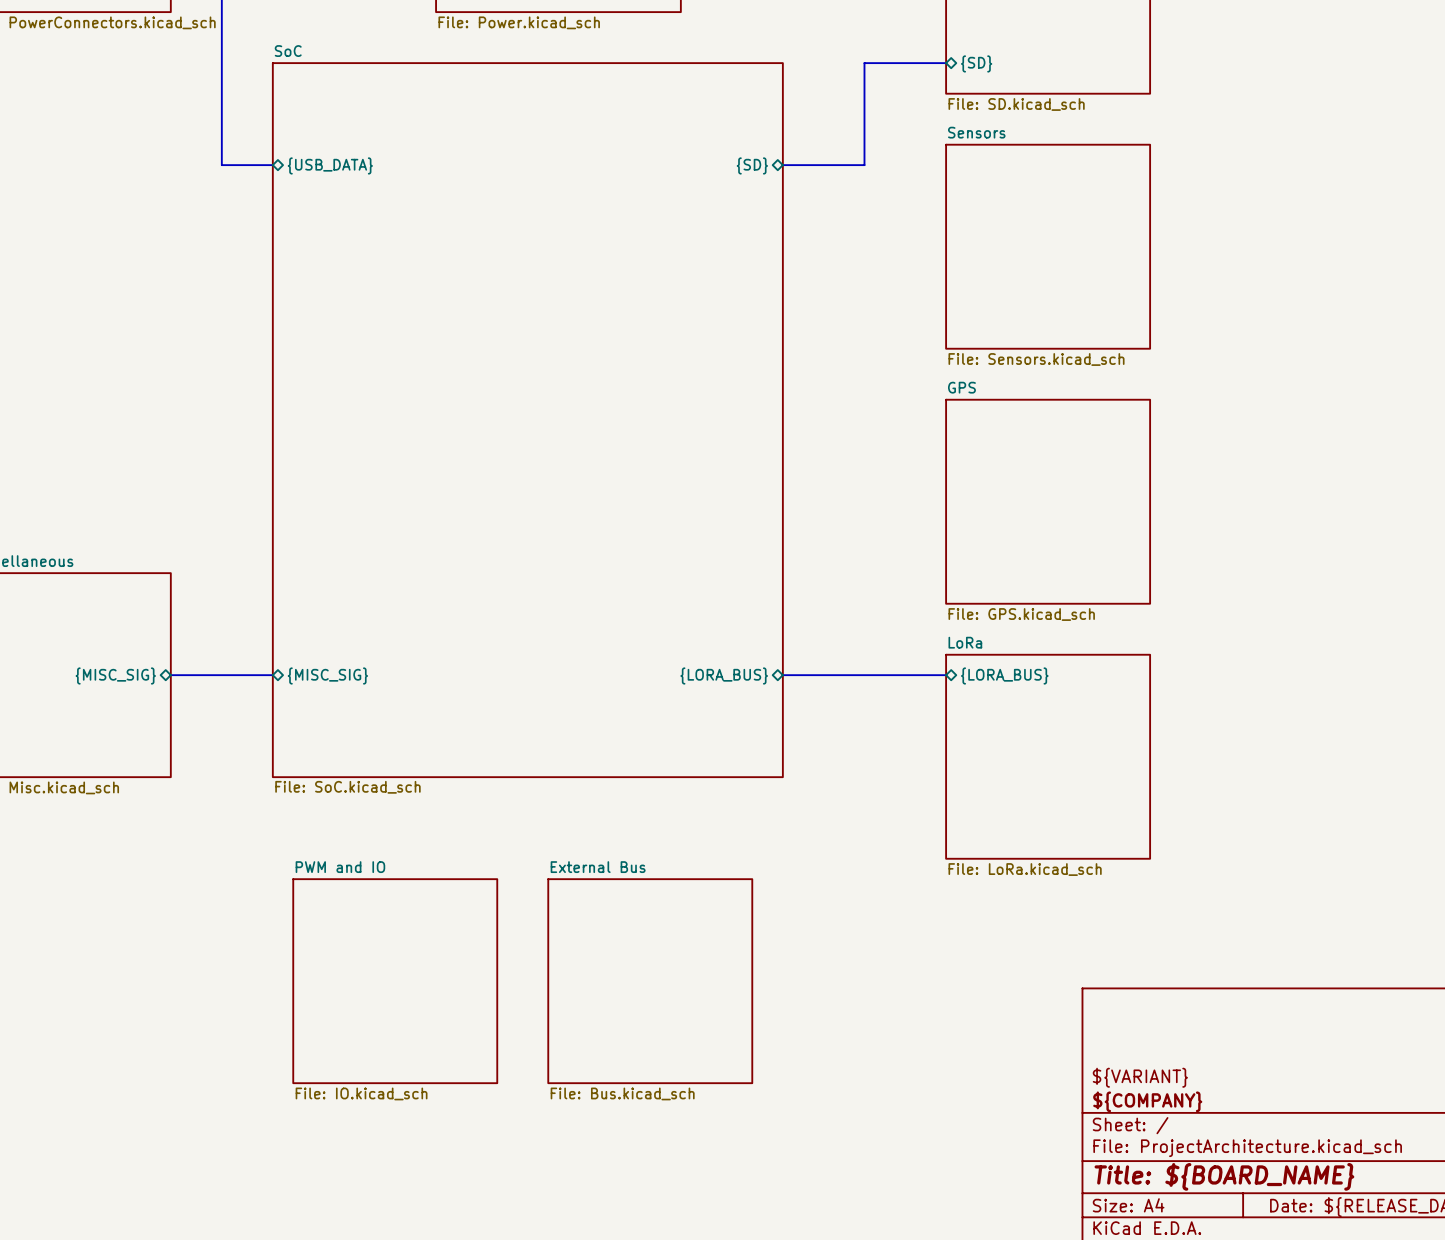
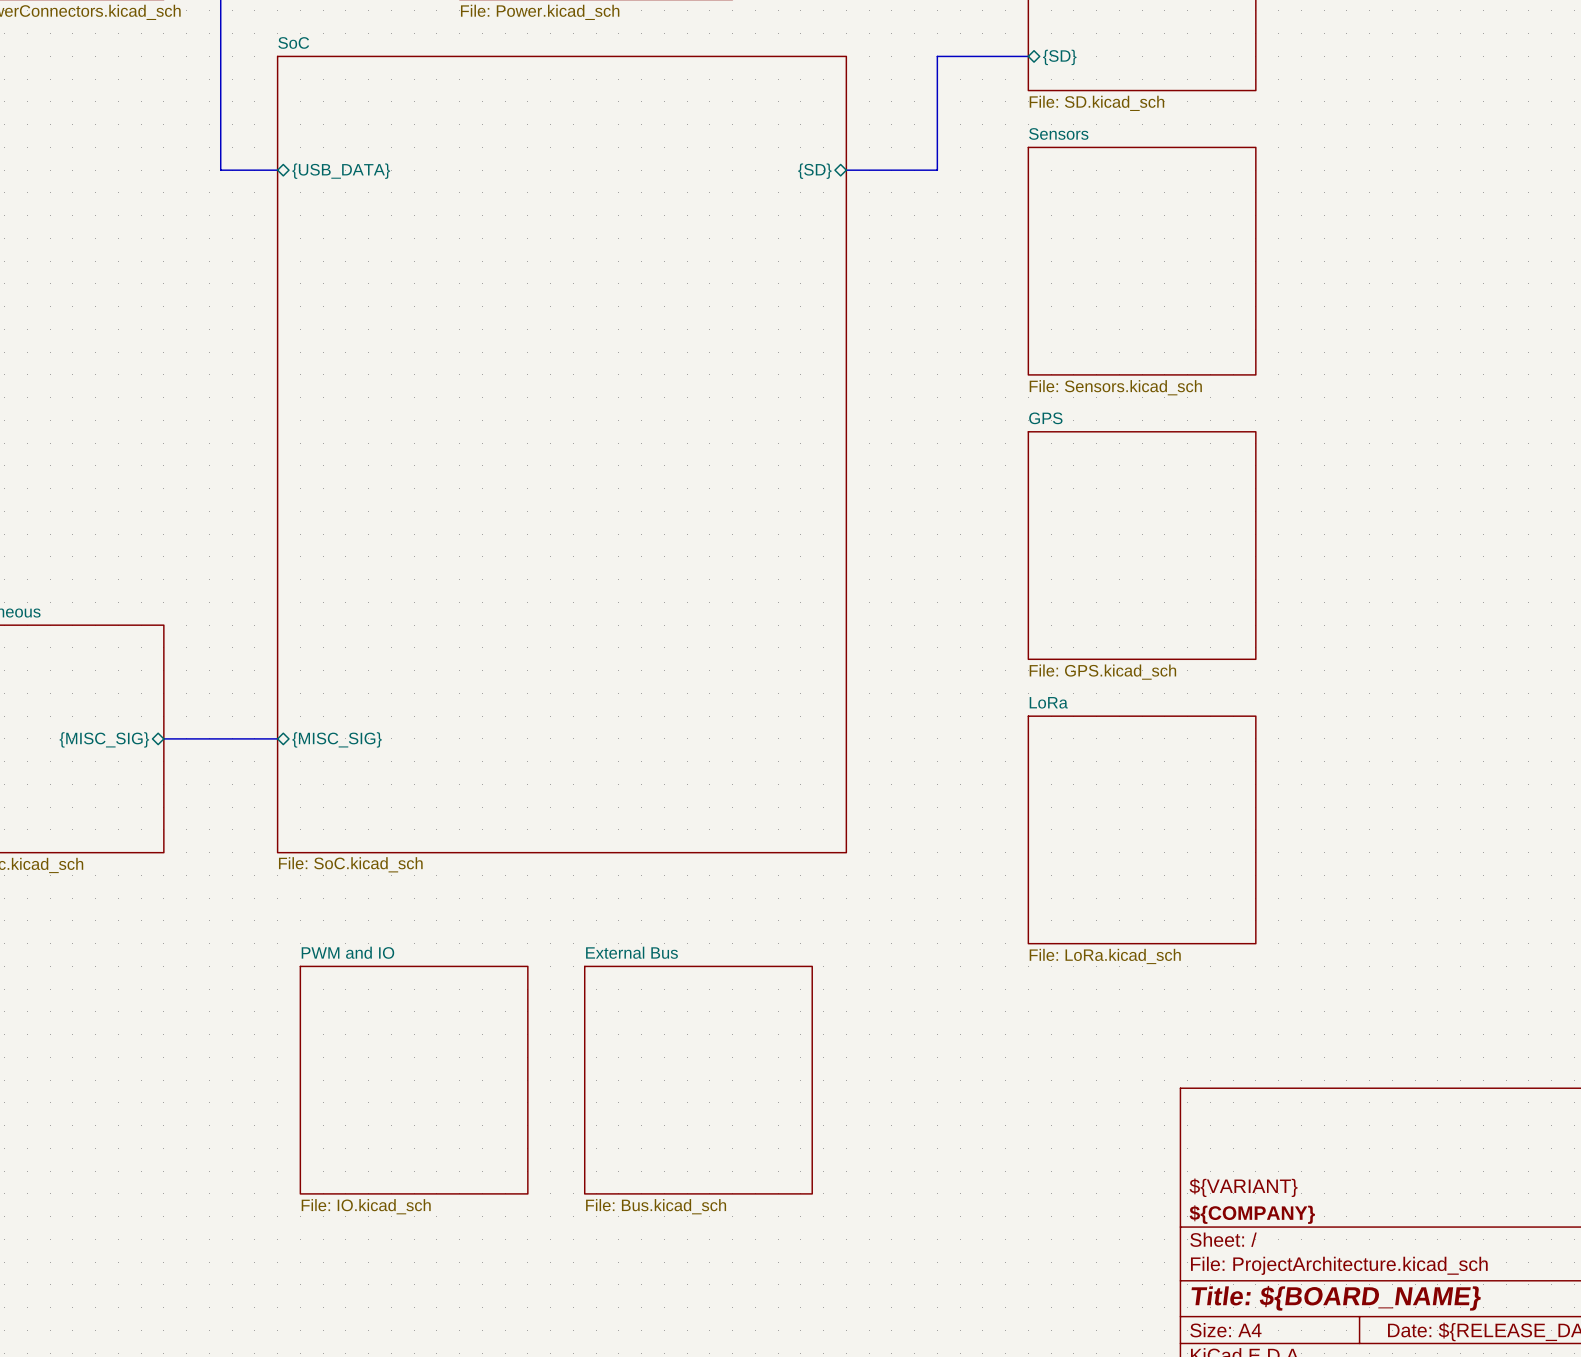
sheet pin: {LORA_BUS} (724, 675) -> none
bus: (782, 675) (946, 675) -> none
sheet pin: {LORA_BUS} (1004, 675) -> none

